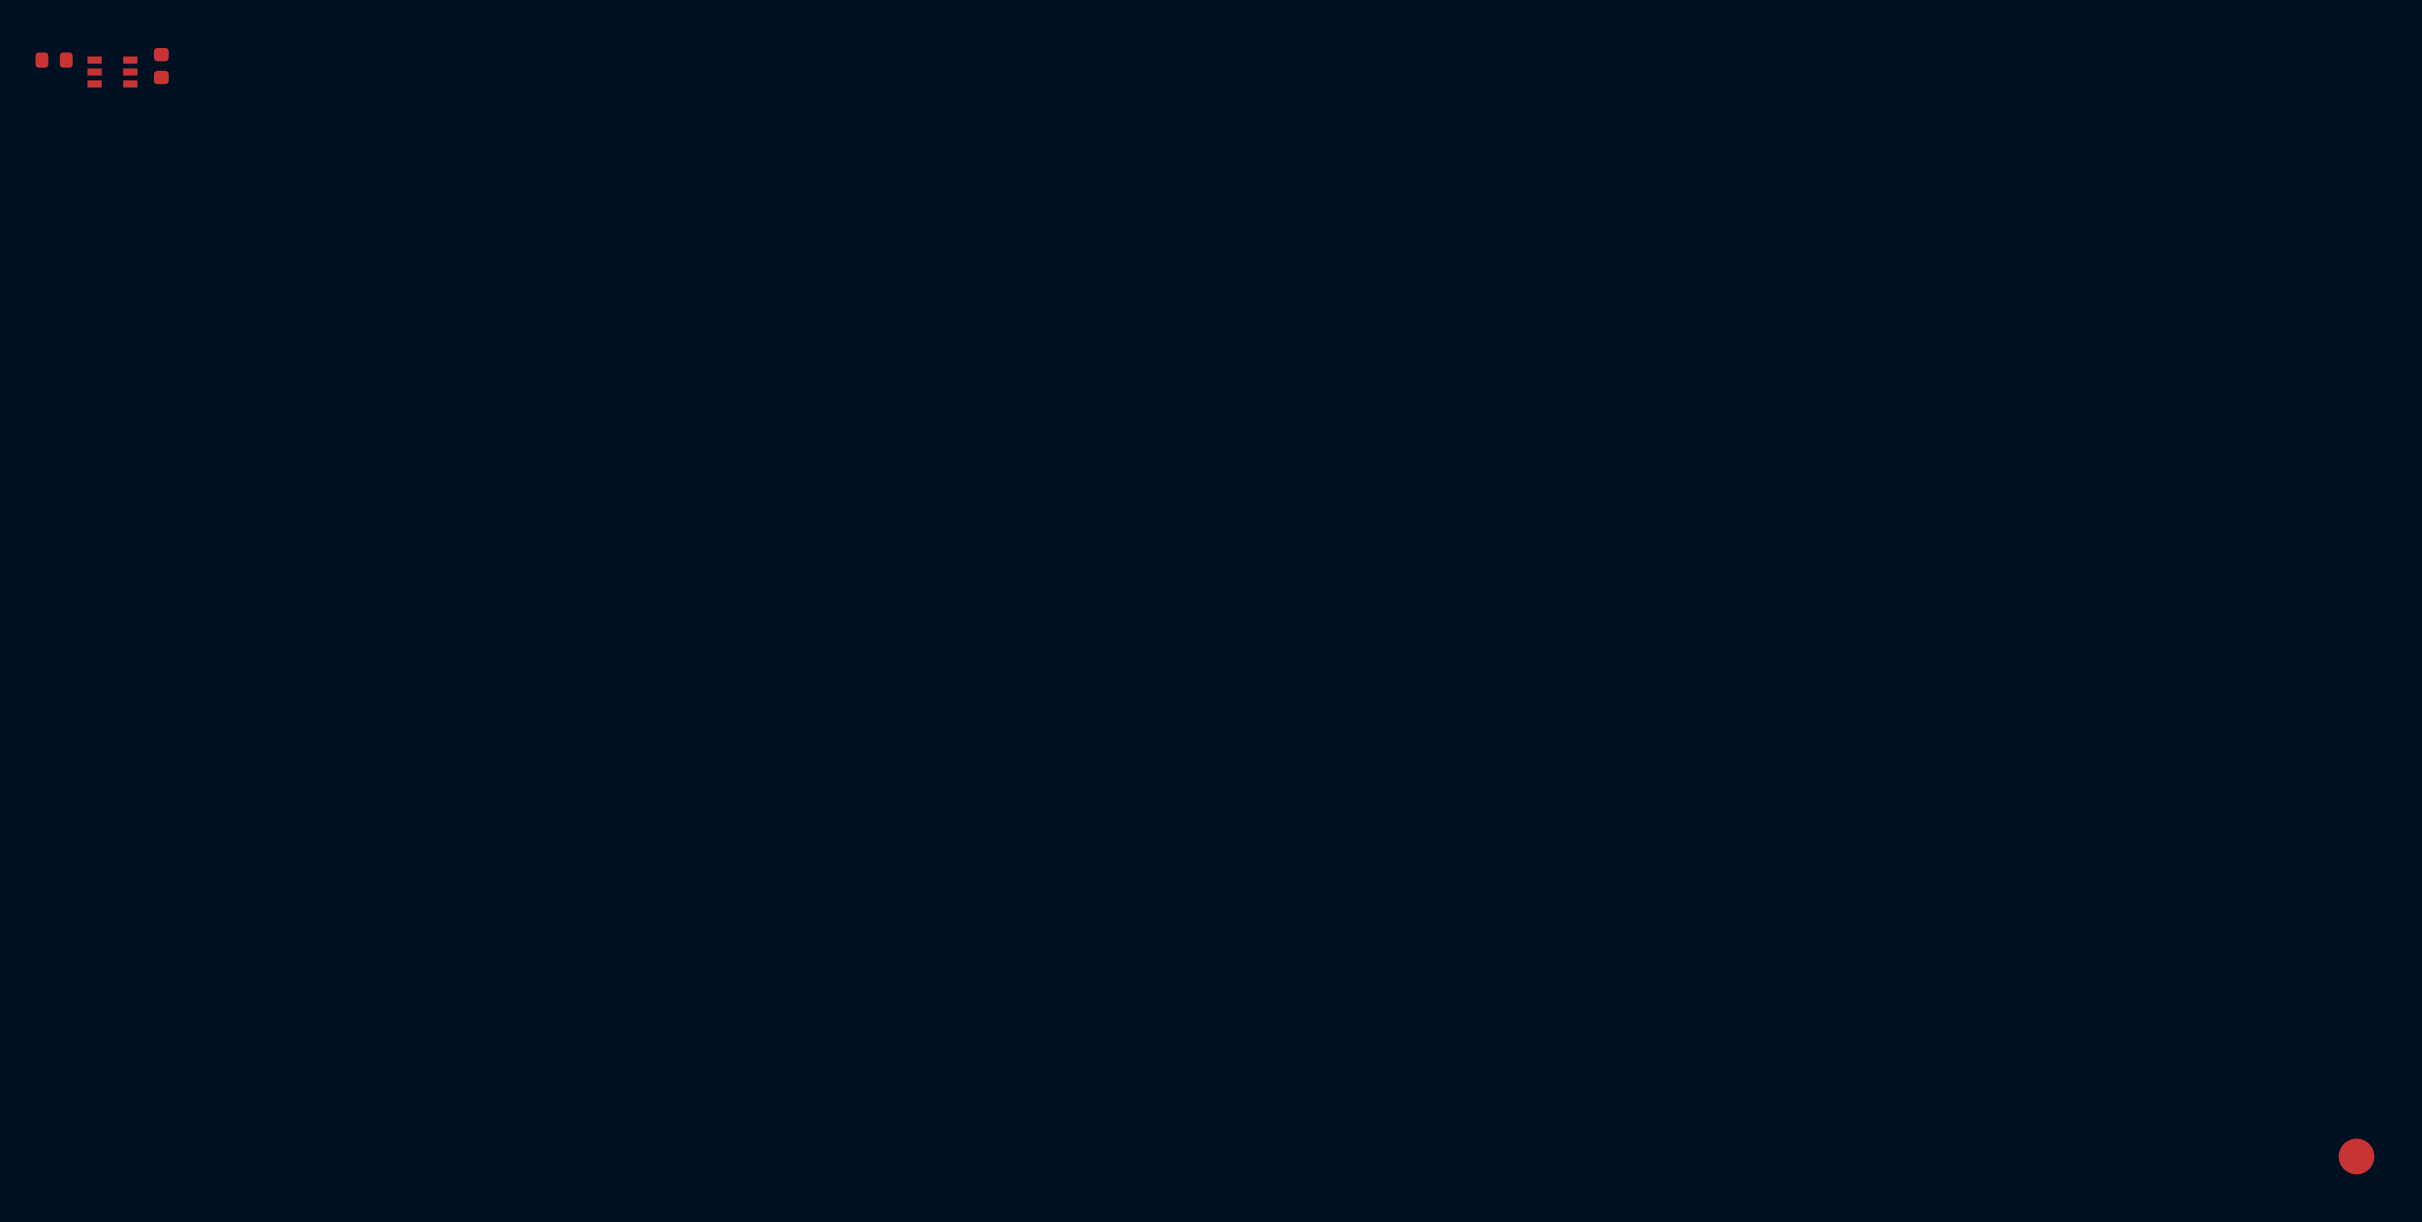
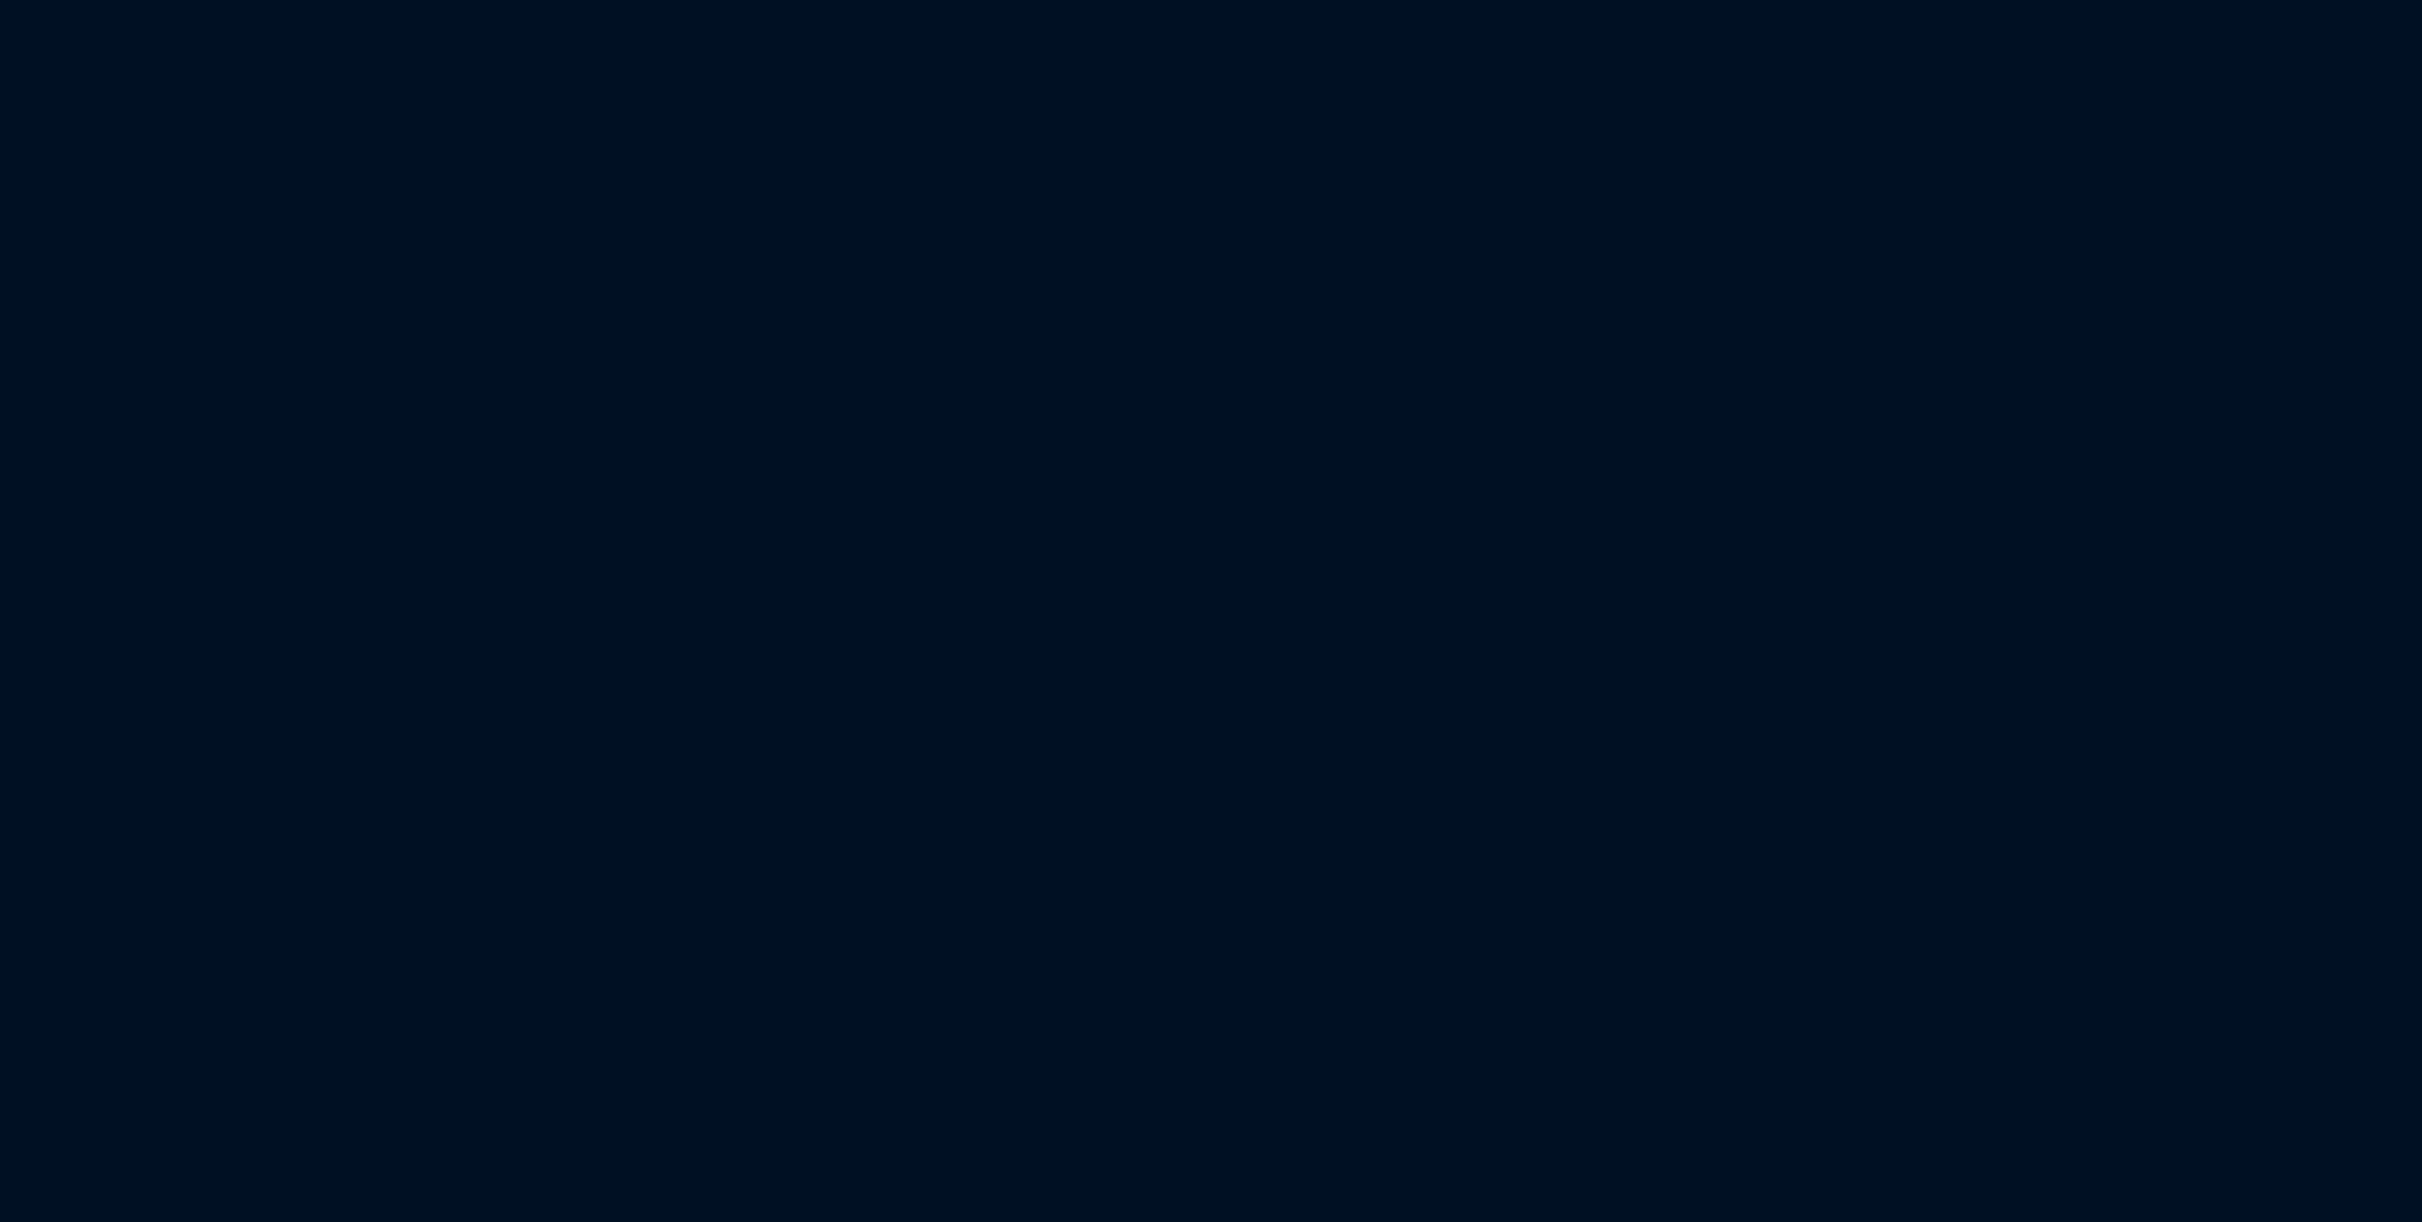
part: (54, 60) -> none
part: (161, 66) -> none
part: (112, 72) -> none
part: (2356, 1156) -> none

